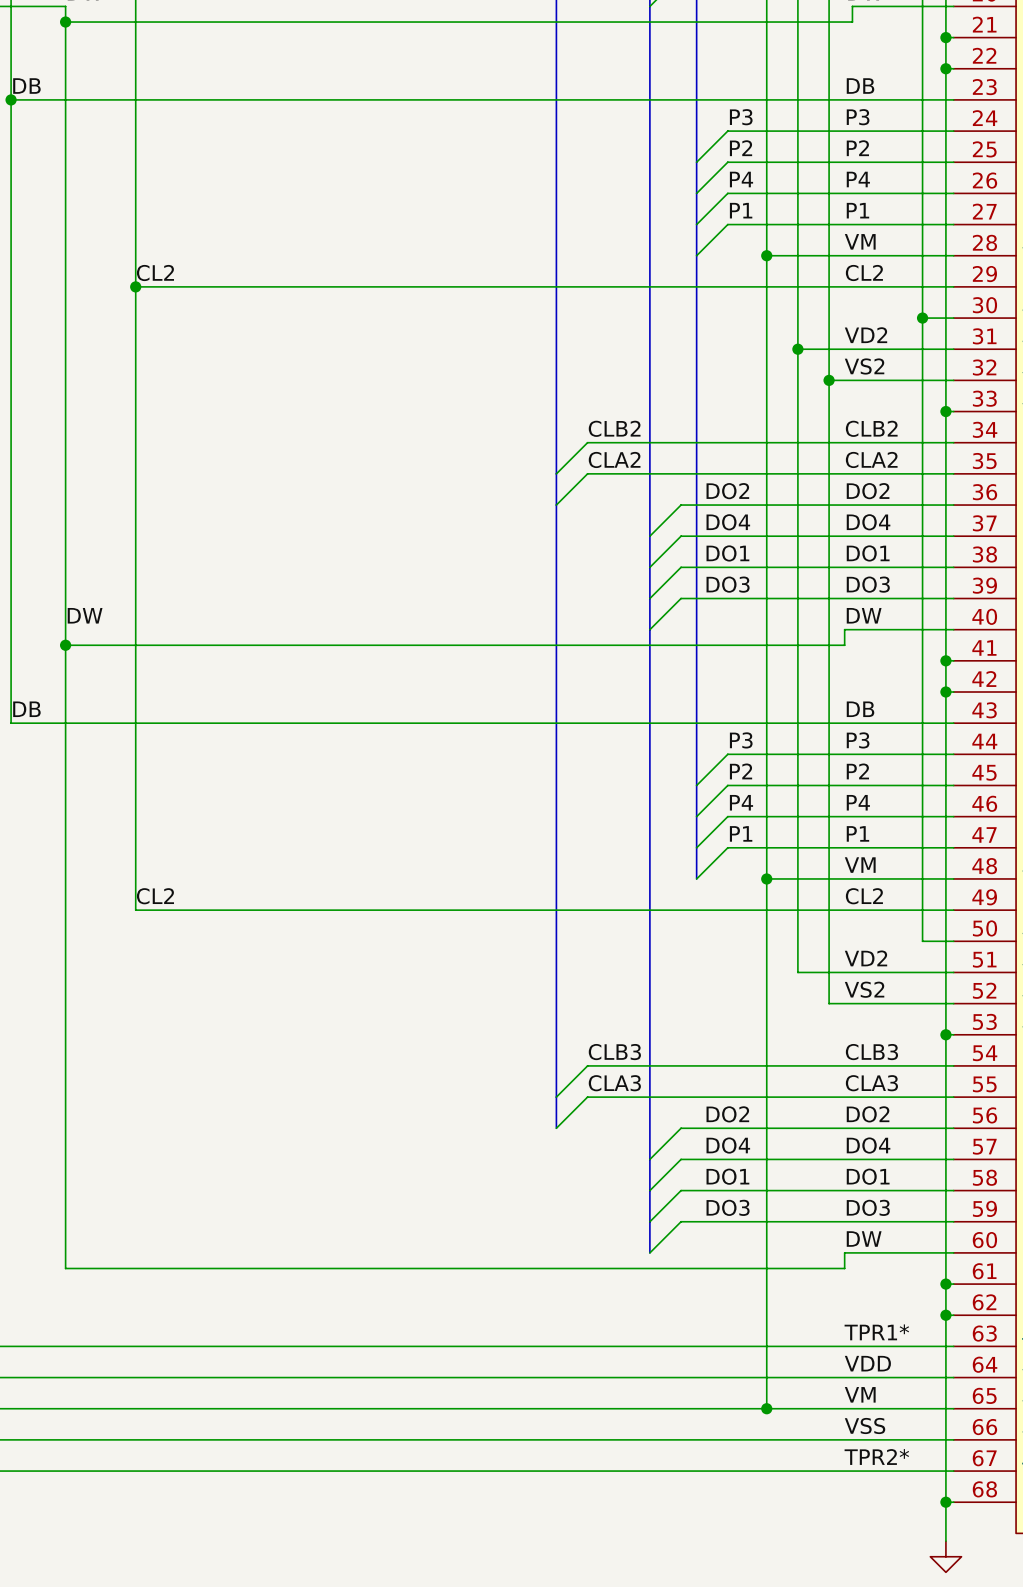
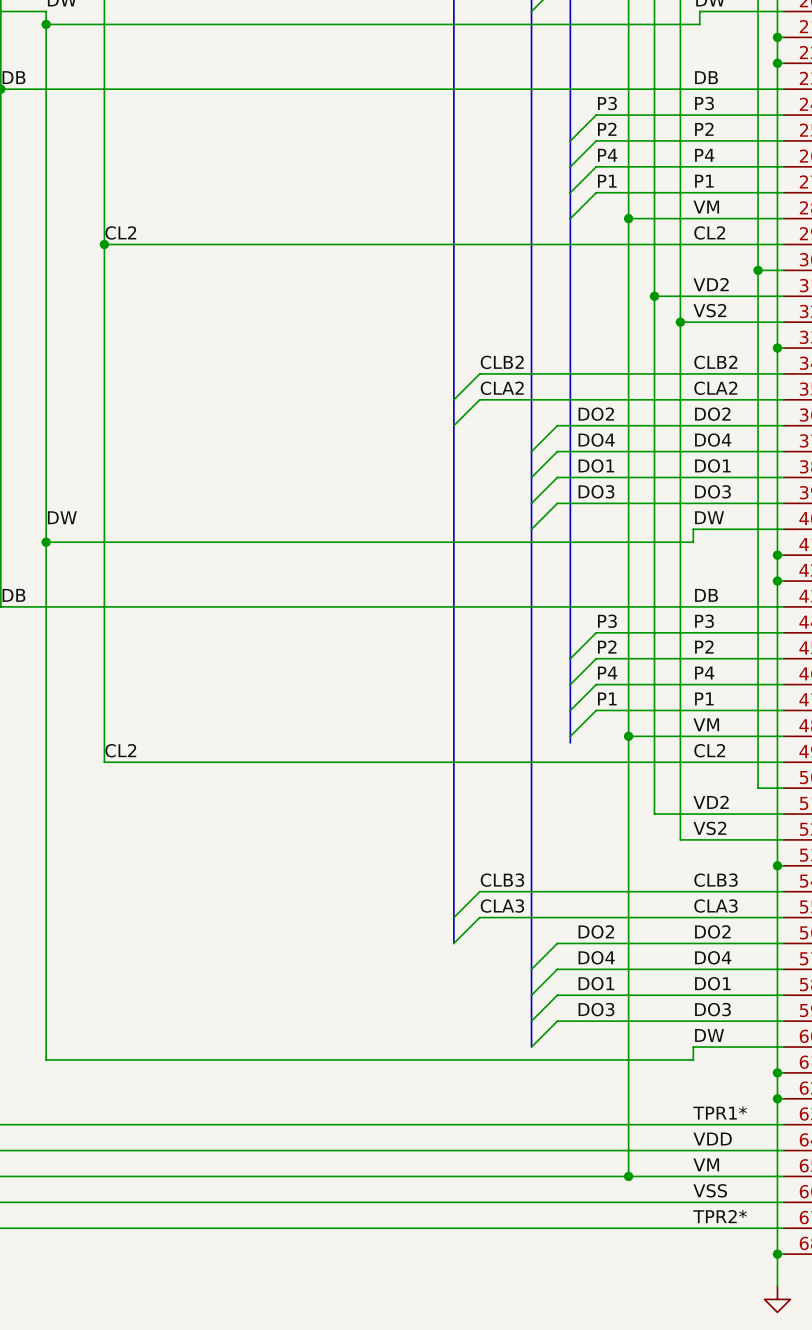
bus: none -> (570, 736) (570, 742)

